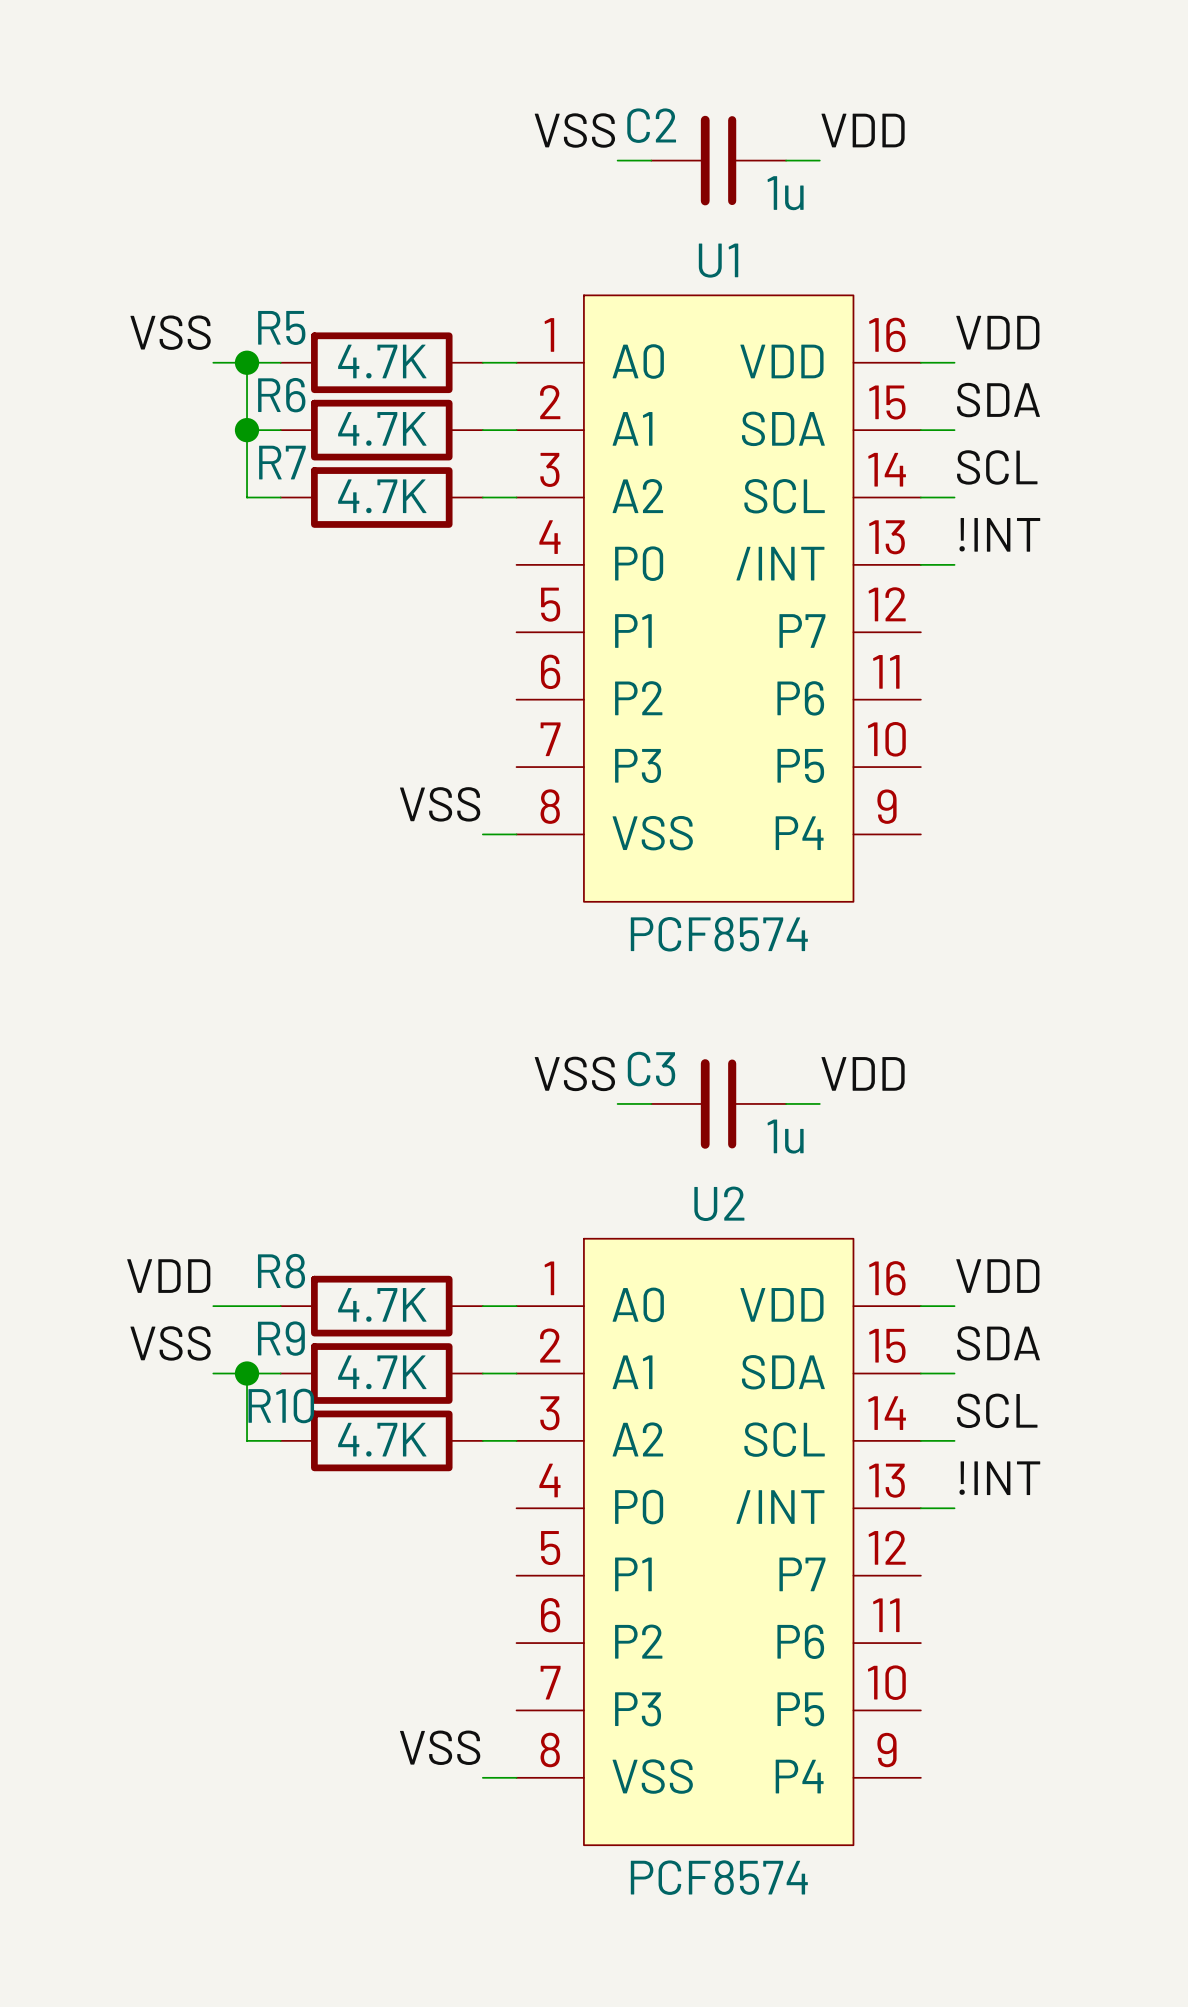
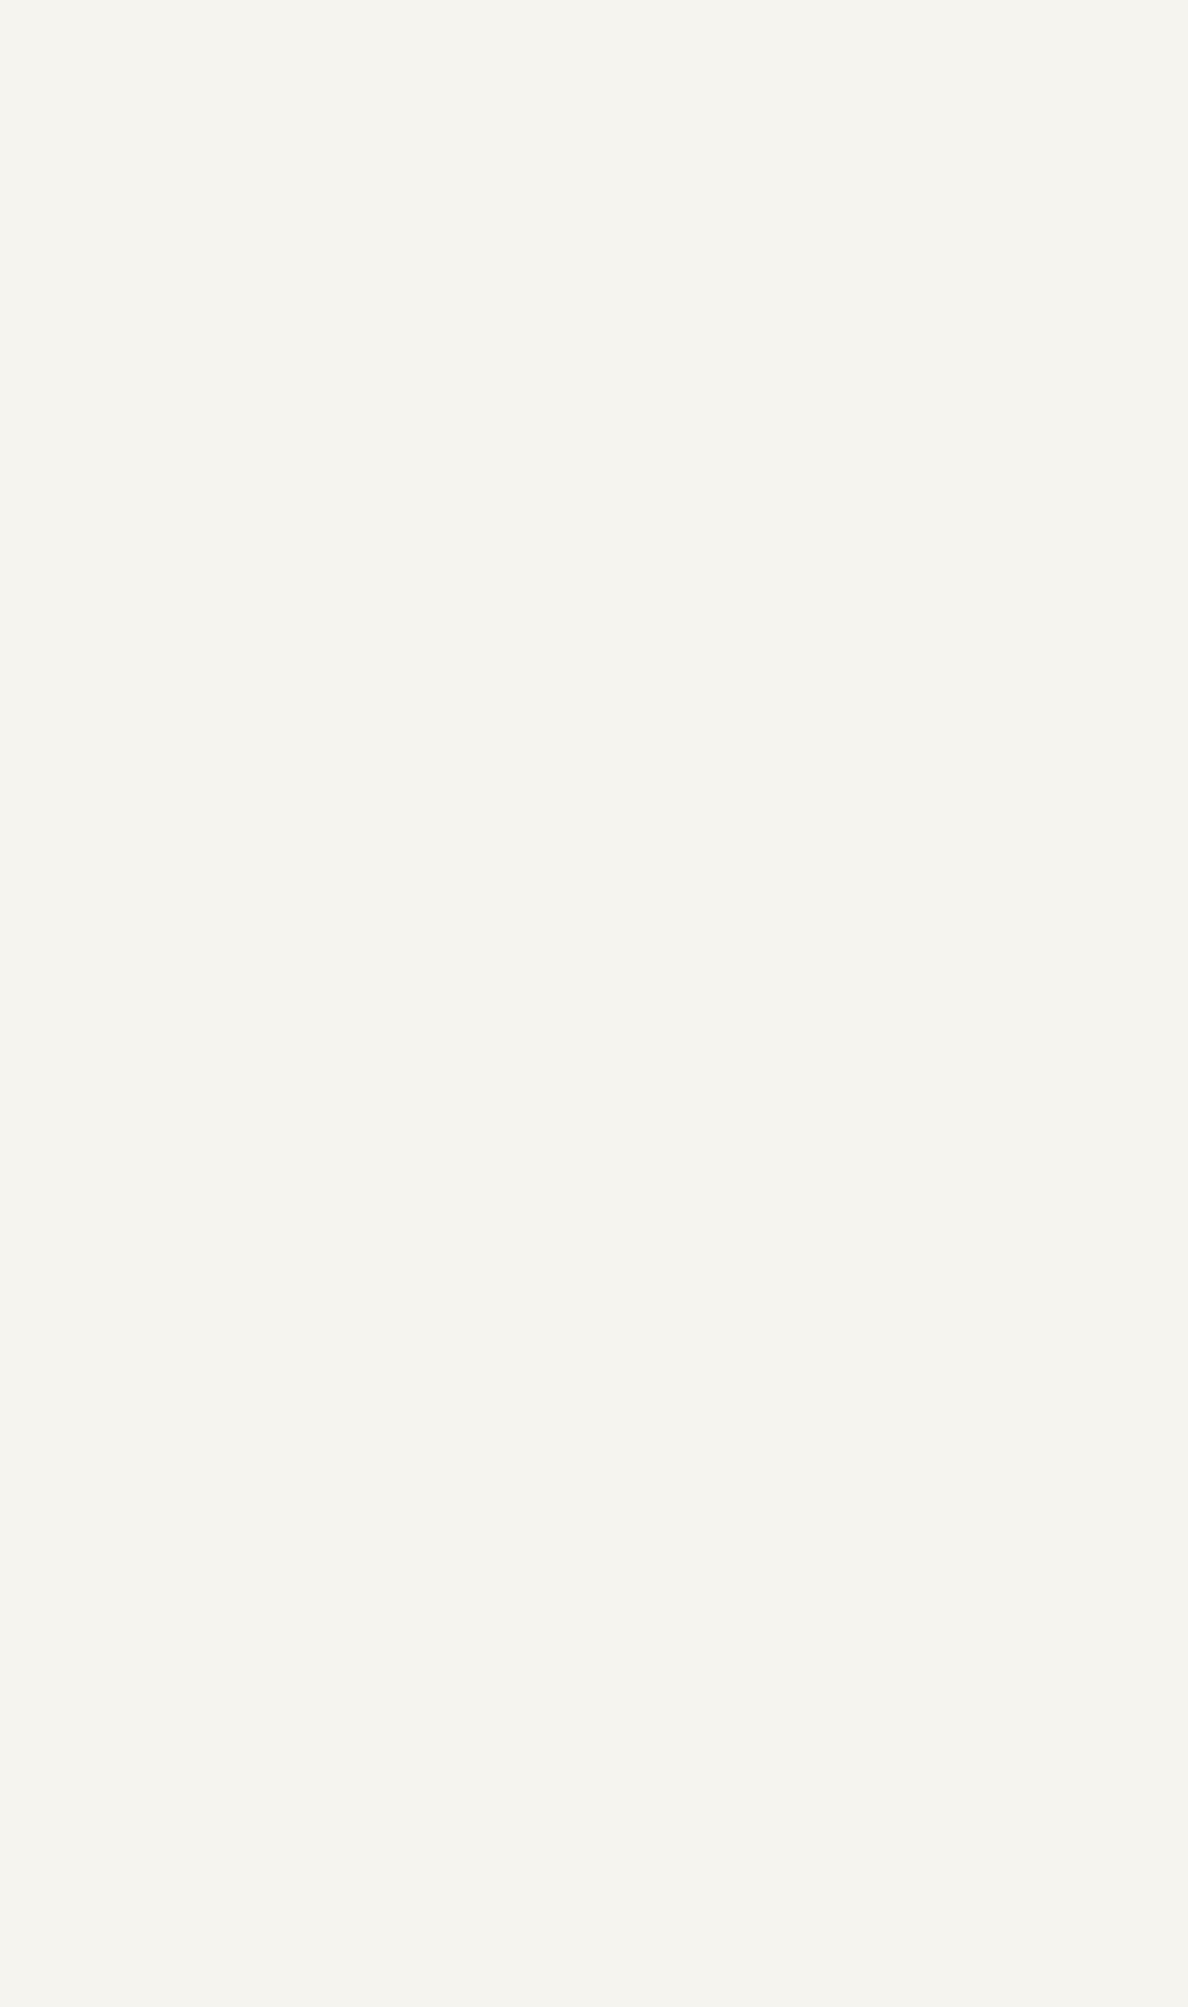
label: VSS (574, 130) -> none
label: VDD (863, 130) -> none
wire: (617, 160) (651, 160) -> none
C2: 1u (718, 160) -> none
wire: (786, 160) (819, 160) -> none
label: VSS (170, 332) -> none
label: VDD (997, 332) -> none
wire: (213, 362) (280, 362) -> none
wire: (247, 362) (247, 497) (280, 497) -> none
junction: (247, 362) -> none
R5: 4.7K (381, 362) -> none
wire: (482, 362) (516, 362) -> none
wire: (920, 362) (954, 362) -> none
label: SDA (998, 400) -> none
wire: (247, 430) (280, 430) -> none
junction: (247, 430) -> none
R6: 4.7K (381, 430) -> none
wire: (482, 430) (516, 430) -> none
wire: (920, 430) (954, 430) -> none
label: SCL (997, 467) -> none
R7: 4.7K (381, 497) -> none
wire: (482, 497) (516, 497) -> none
wire: (920, 497) (954, 497) -> none
label: !INT (999, 534) -> none
wire: (920, 564) (954, 564) -> none
U1: PCF8574 (718, 598) -> none
label: VSS (440, 804) -> none
wire: (482, 834) (516, 834) -> none
label: VSS (574, 1073) -> none
label: VDD (863, 1073) -> none
wire: (617, 1103) (651, 1103) -> none
C3: 1u (718, 1103) -> none
wire: (786, 1103) (819, 1103) -> none
label: VDD (168, 1276) -> none
label: VDD (997, 1276) -> none
wire: (213, 1306) (280, 1306) -> none
R8: 4.7K (381, 1306) -> none
wire: (482, 1306) (516, 1306) -> none
wire: (920, 1306) (954, 1306) -> none
label: VSS (170, 1343) -> none
label: SDA (998, 1343) -> none
wire: (213, 1373) (280, 1373) -> none
wire: (247, 1373) (247, 1440) (280, 1440) -> none
junction: (247, 1373) -> none
R9: 4.7K (381, 1373) -> none
wire: (482, 1373) (516, 1373) -> none
wire: (920, 1373) (954, 1373) -> none
label: SCL (997, 1410) -> none
R10: 4.7K (381, 1440) -> none
wire: (482, 1440) (516, 1440) -> none
wire: (920, 1440) (954, 1440) -> none
label: !INT (999, 1478) -> none
wire: (920, 1508) (954, 1508) -> none
U2: PCF8574 (718, 1541) -> none
label: VSS (440, 1747) -> none
wire: (482, 1777) (516, 1777) -> none

